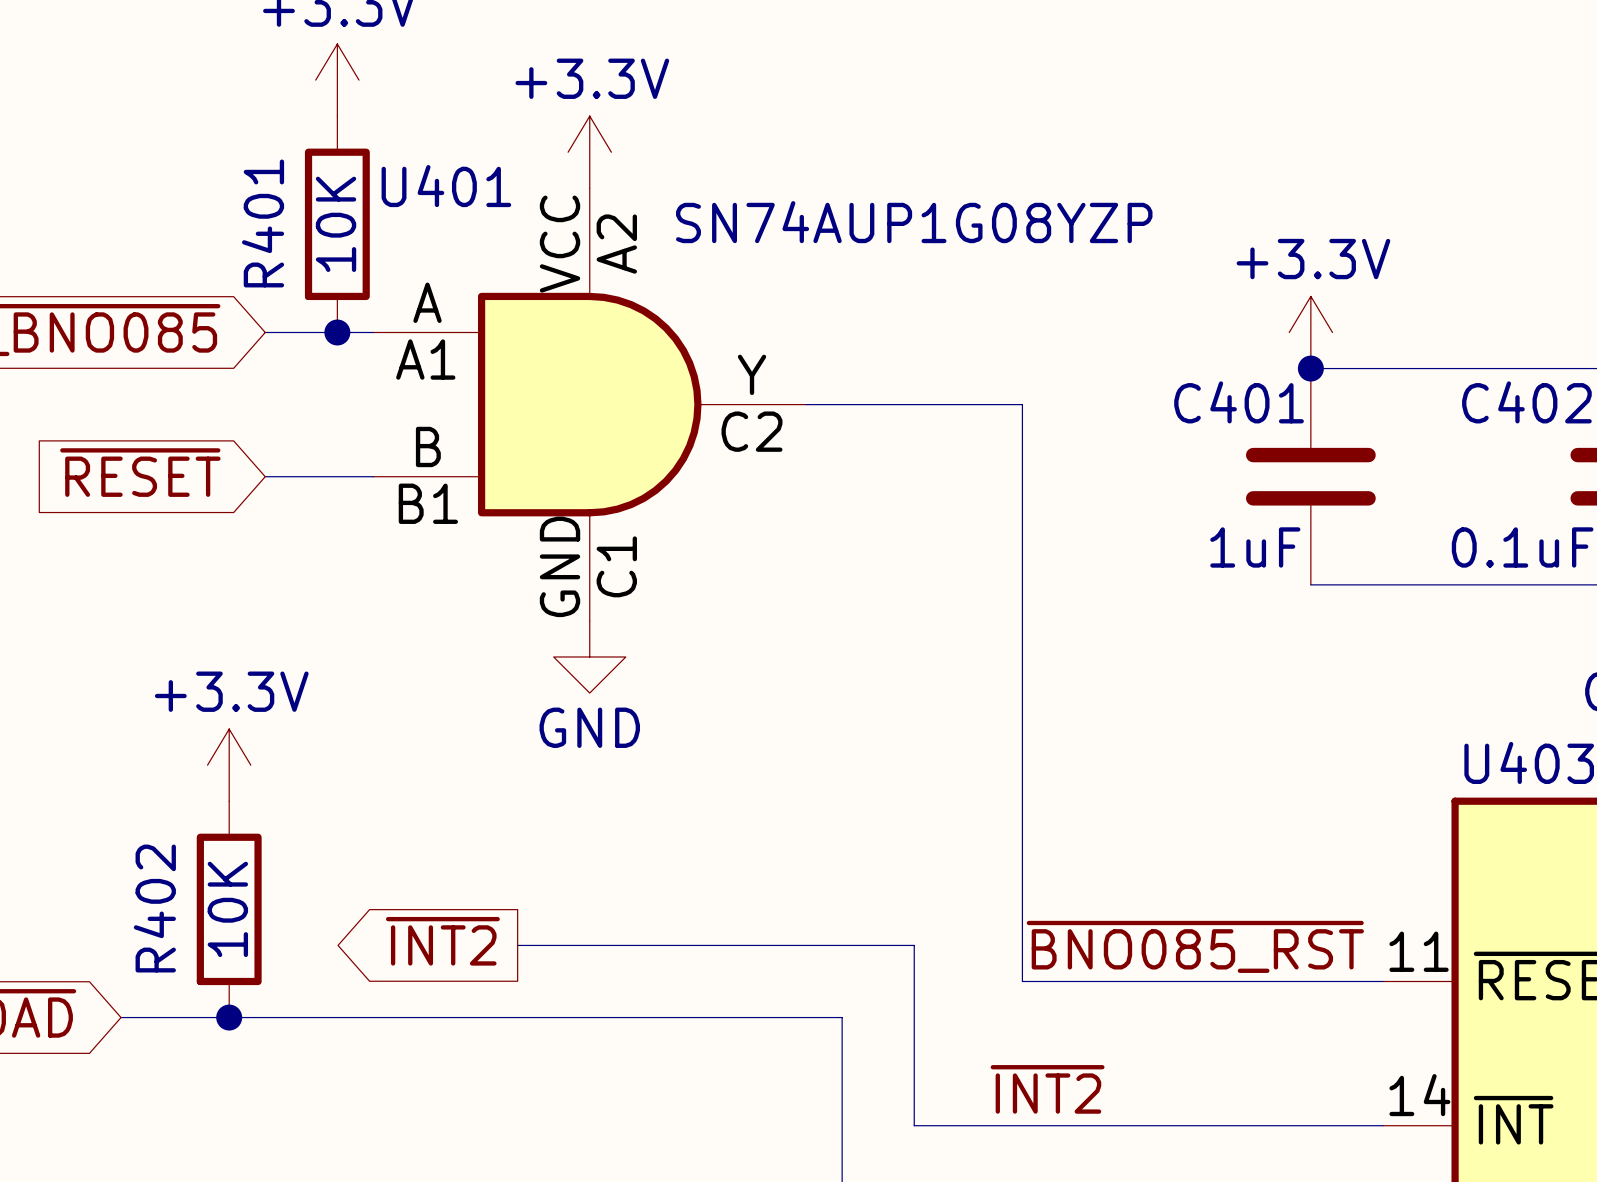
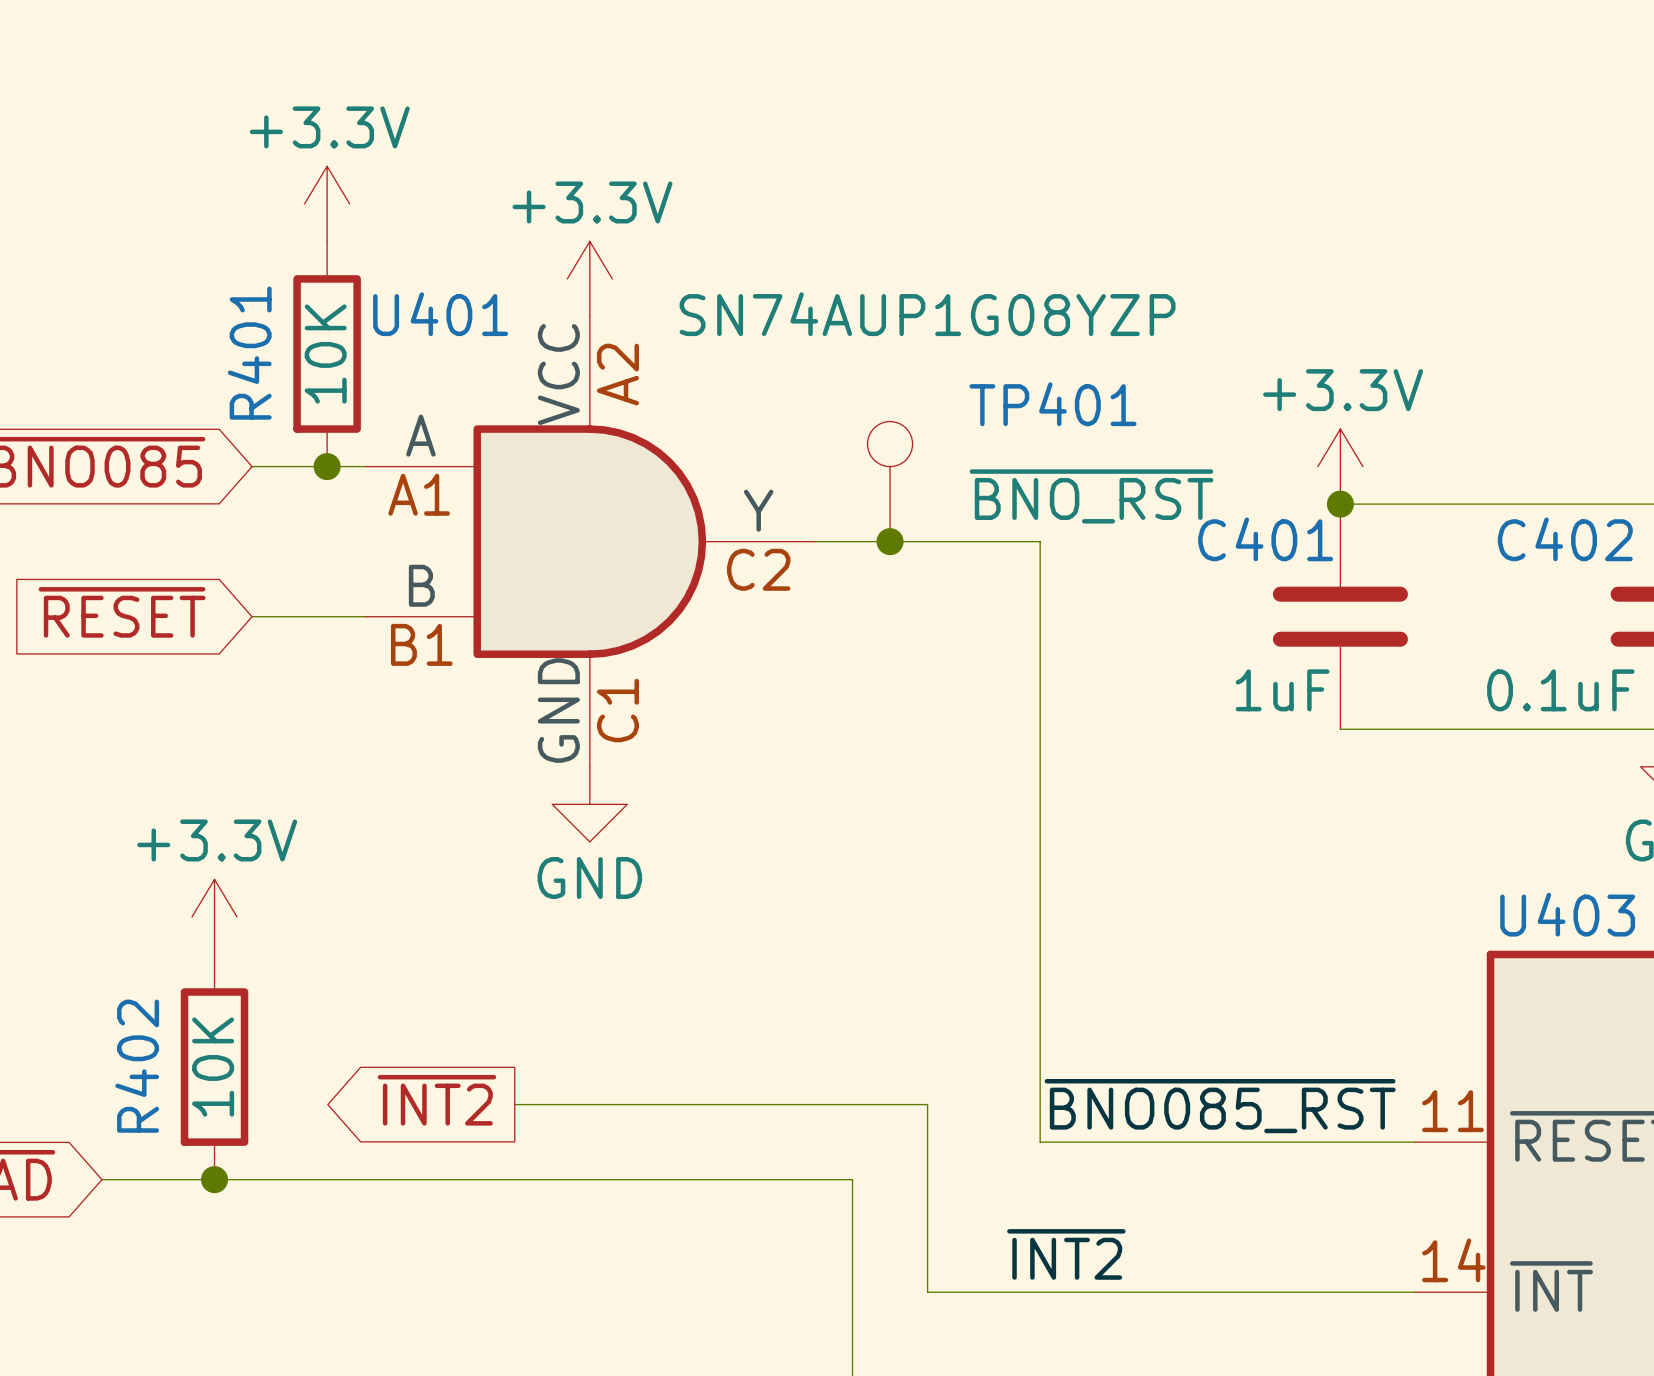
U401 value position: SN74AUP1G08YZP (914, 222) -> SN74AUP1G08YZP (927, 314)
TP401: none -> ~{BNO_RST} (890, 481)
junction: none -> (890, 541)

